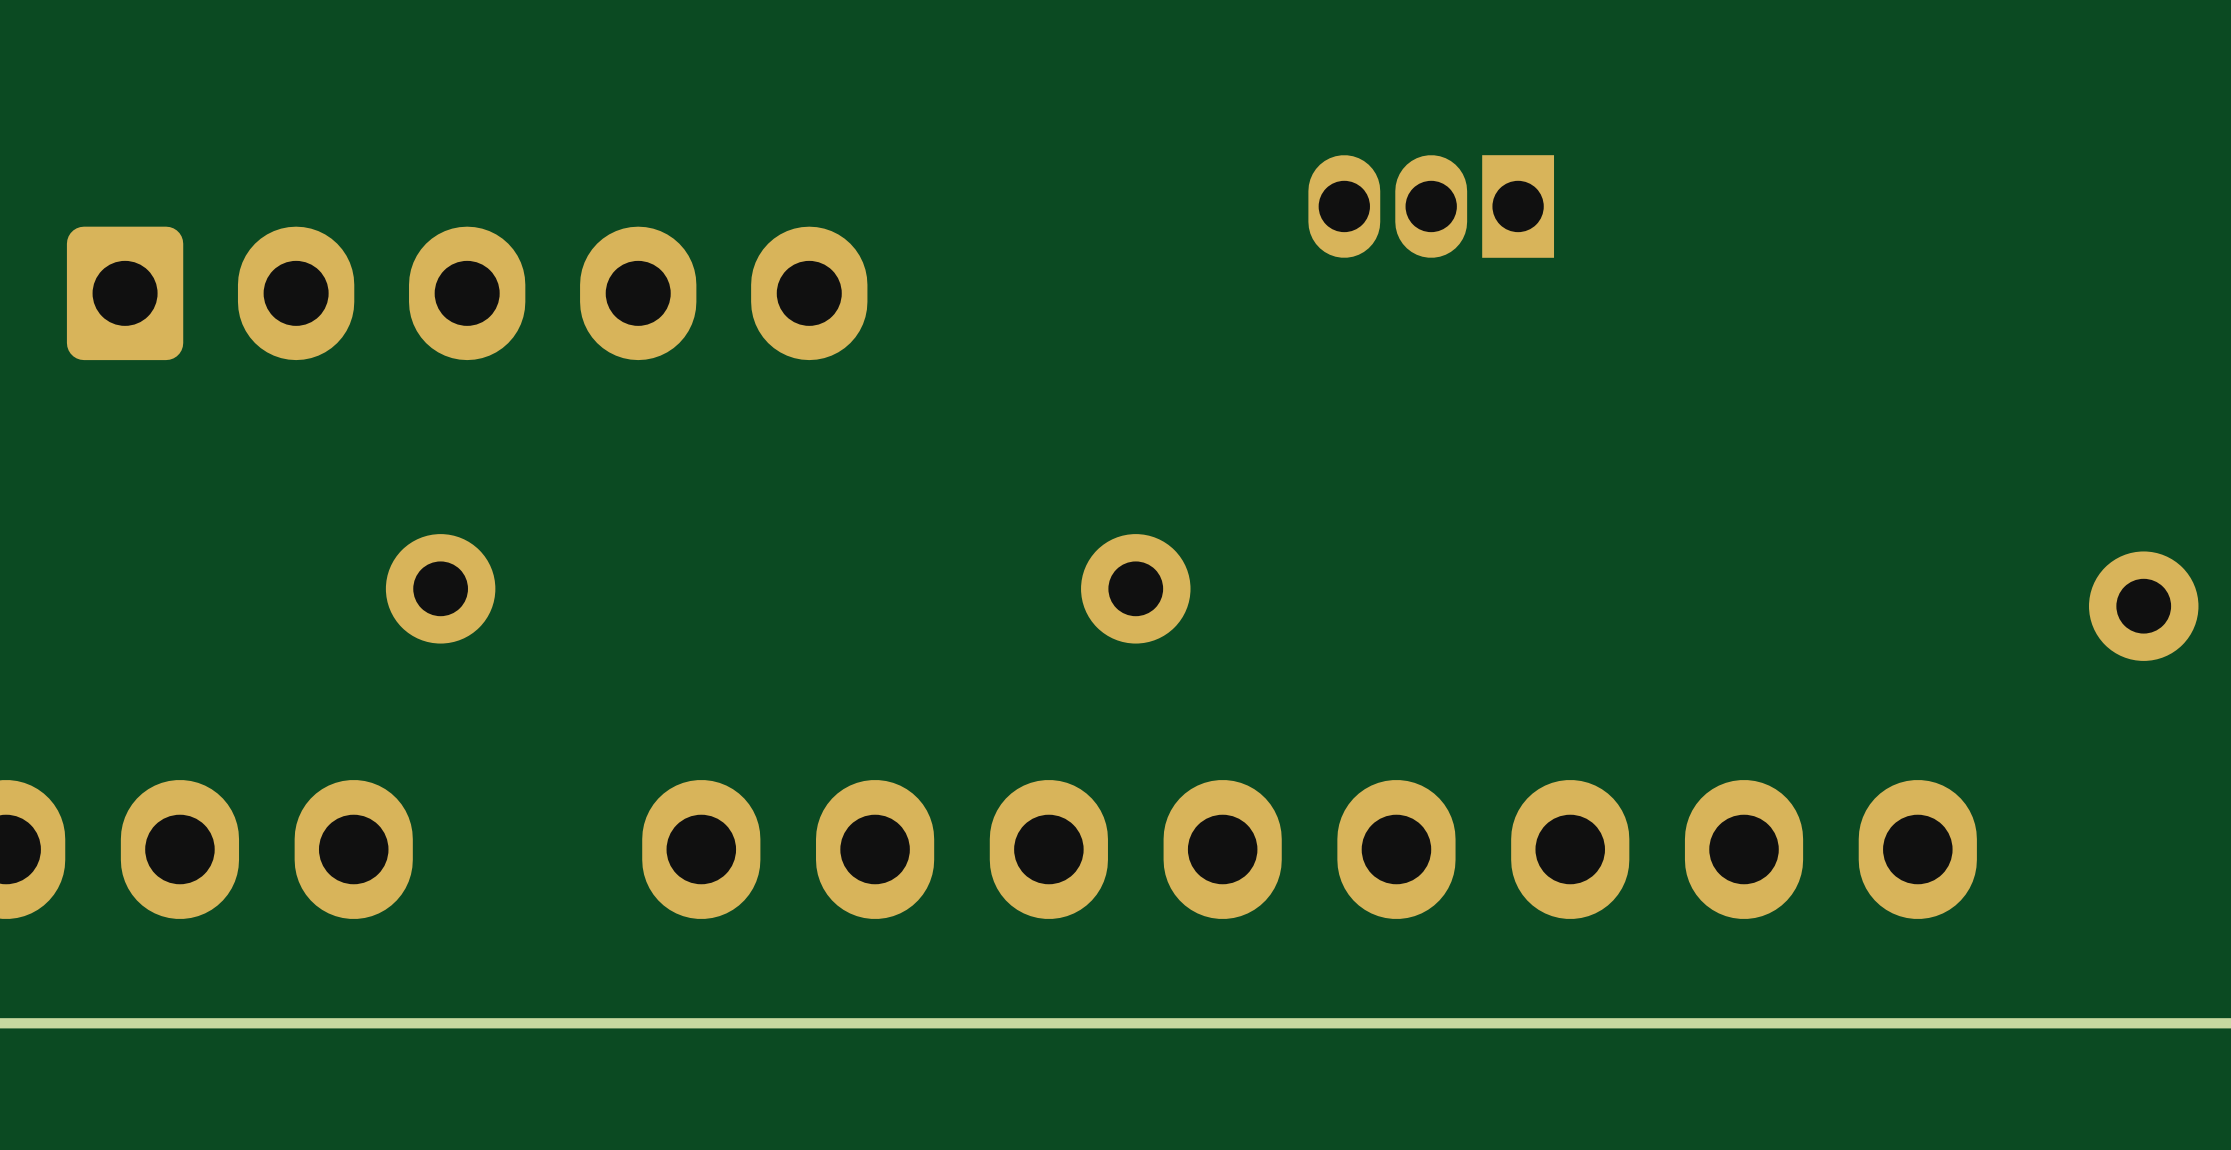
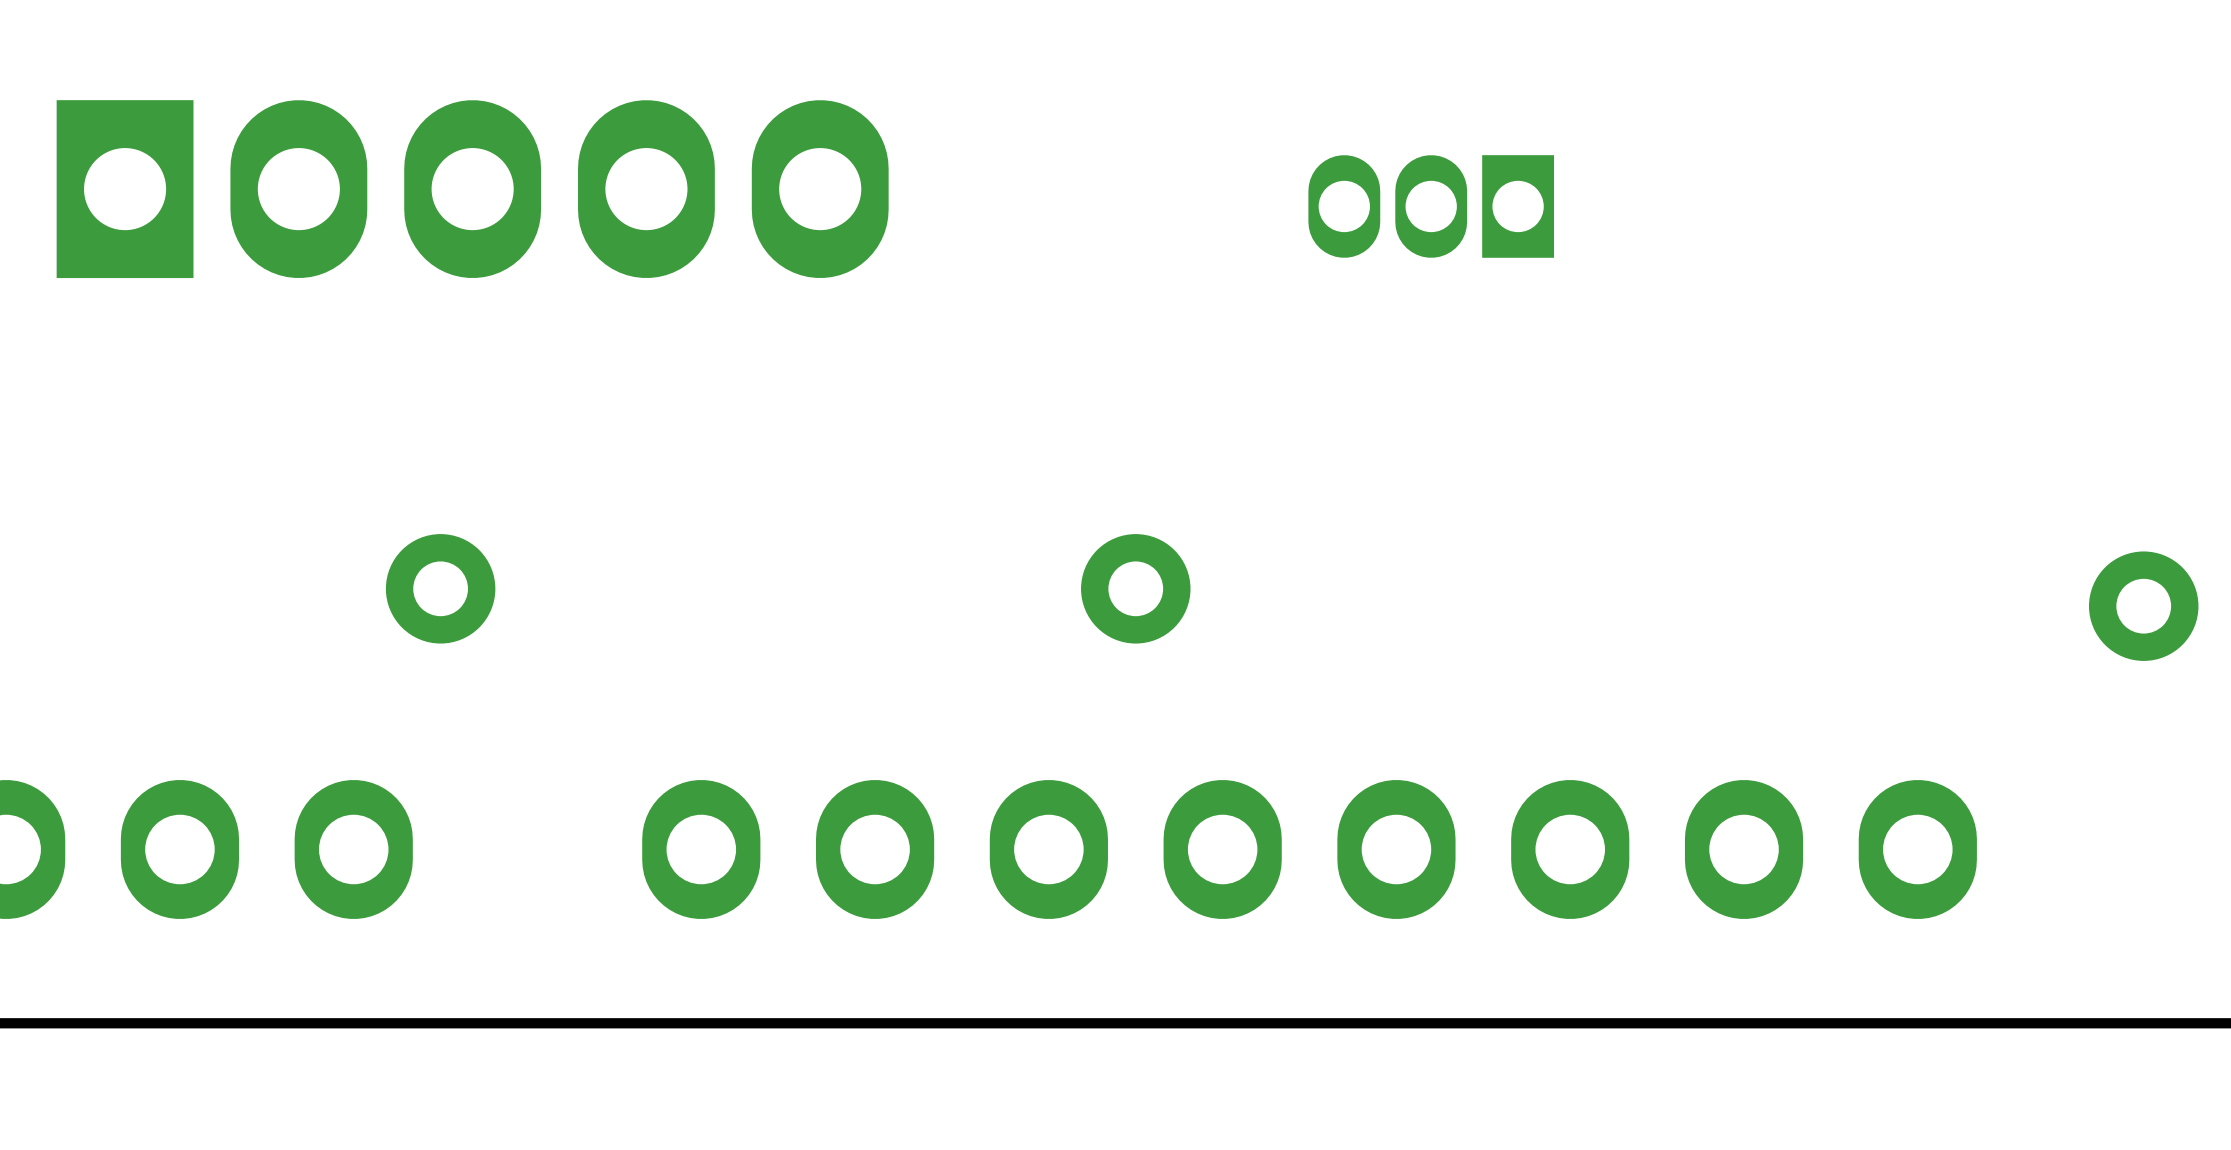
part: none -> (472, 189)
part: (467, 293) -> none

